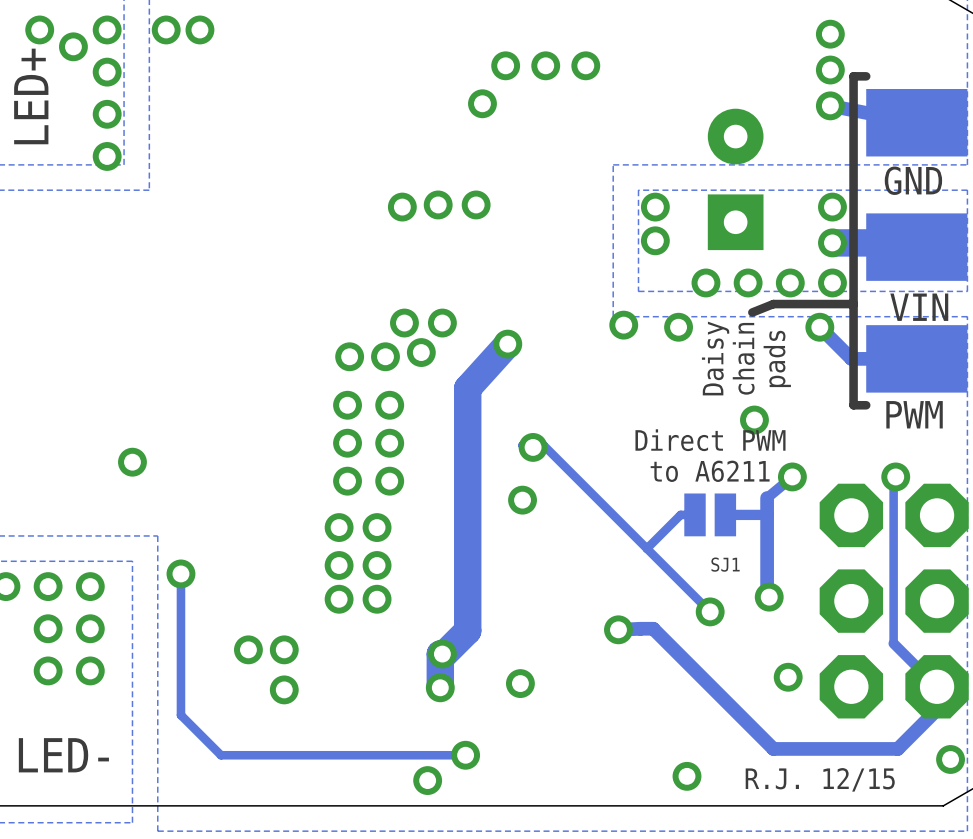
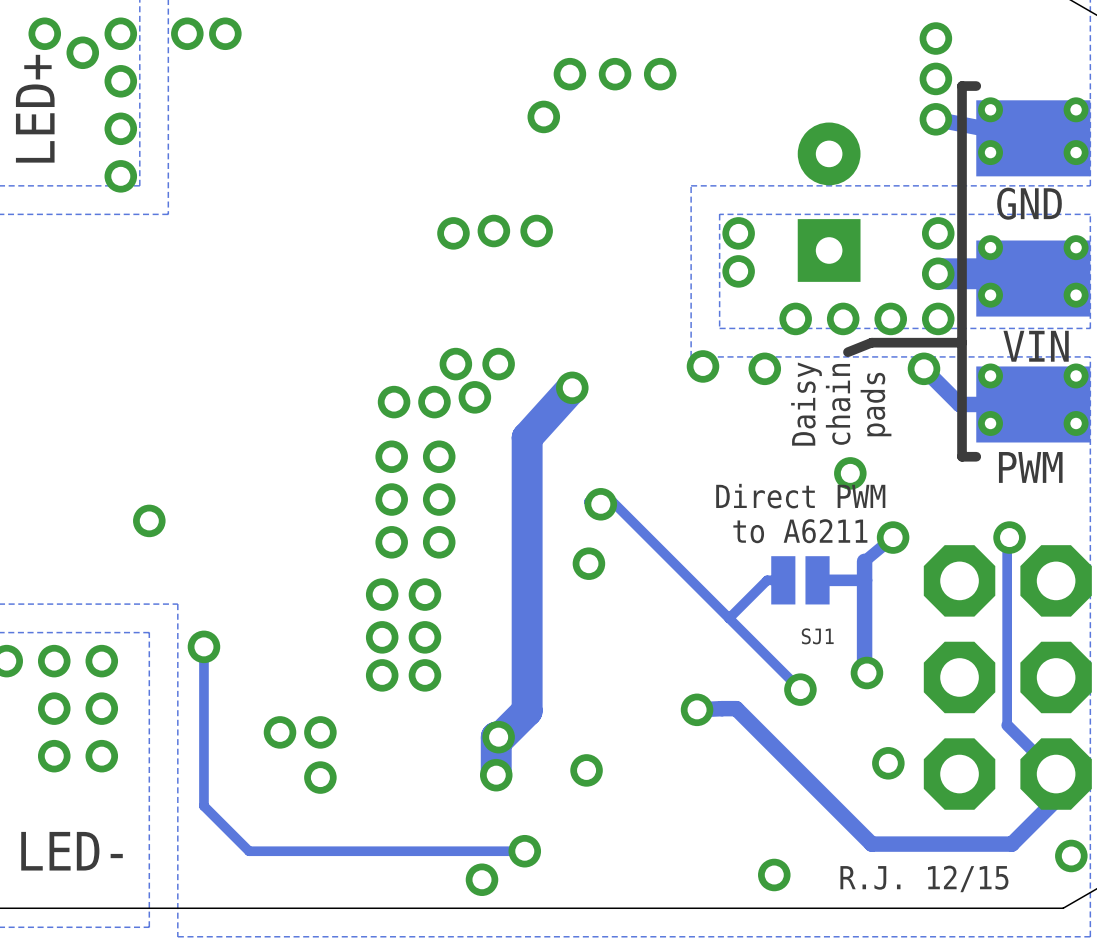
via: none -> (990, 109)
via: none -> (1076, 109)
via: none -> (990, 152)
via: none -> (1076, 152)
via: none -> (990, 247)
via: none -> (1076, 247)
via: none -> (990, 295)
via: none -> (1076, 295)
via: none -> (990, 375)
via: none -> (1076, 375)
via: none -> (990, 423)
via: none -> (1076, 423)

